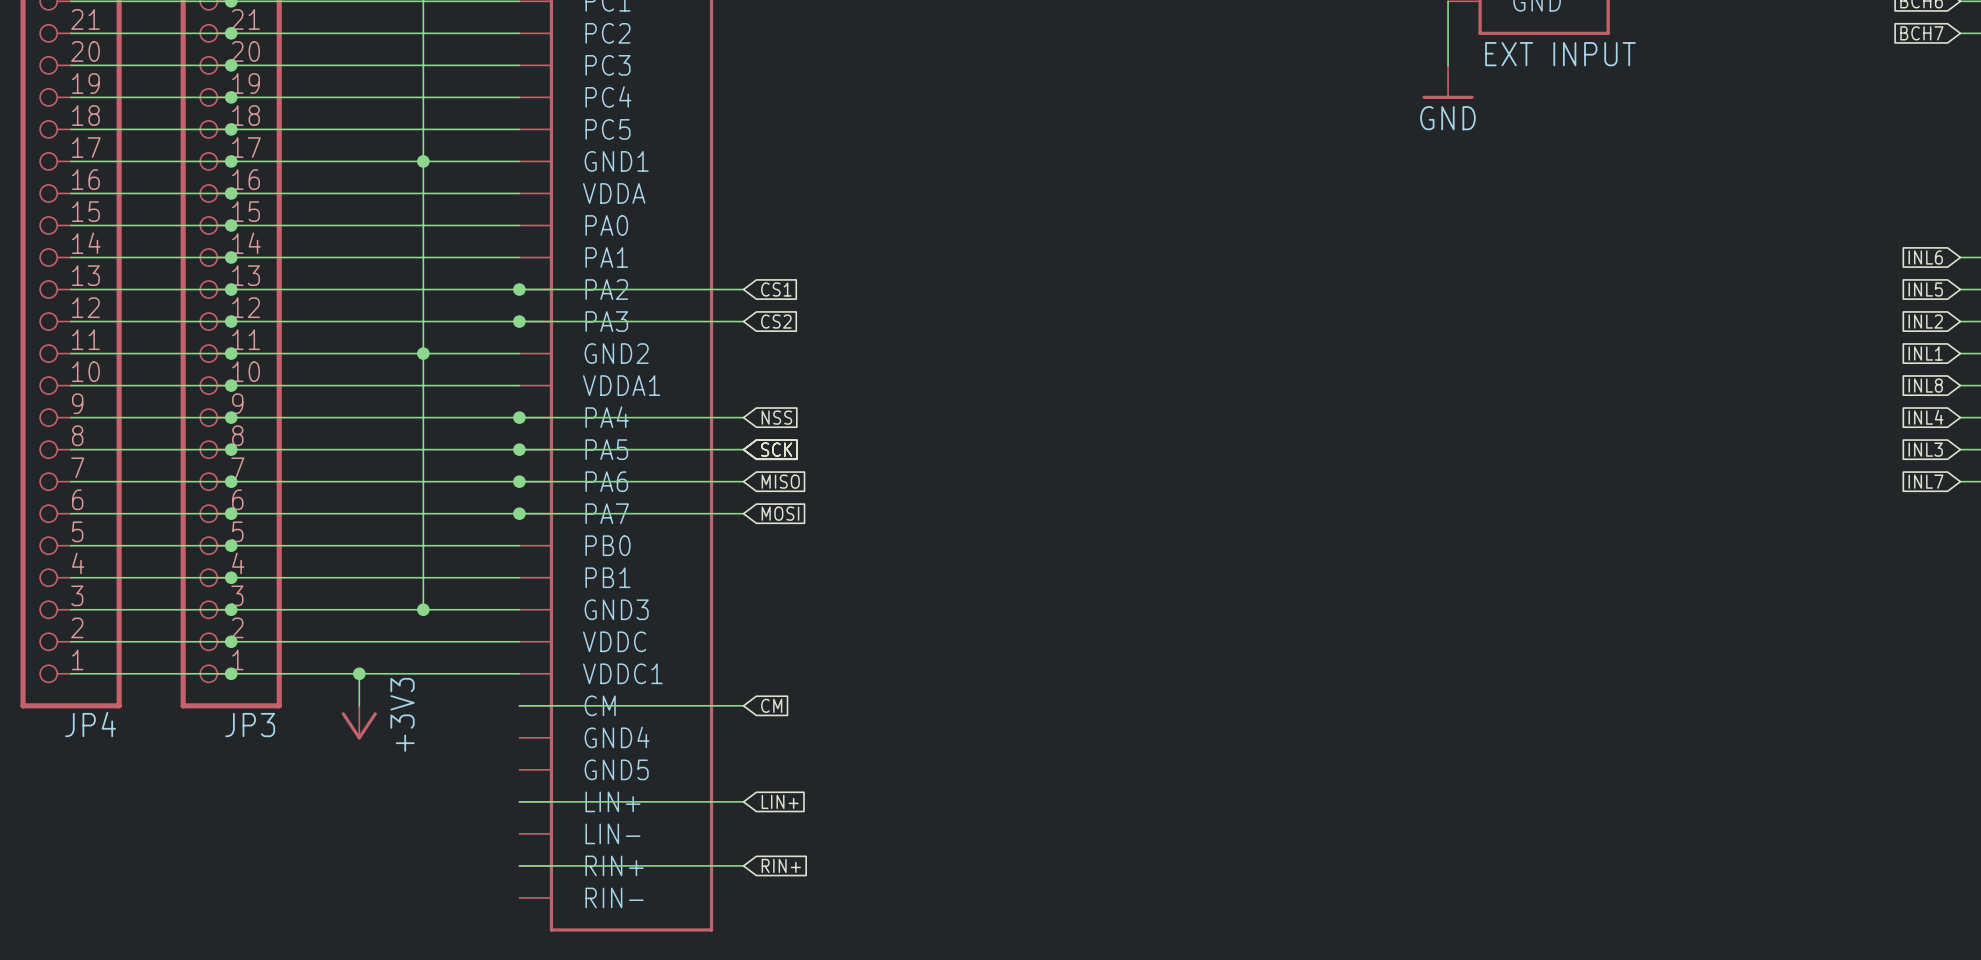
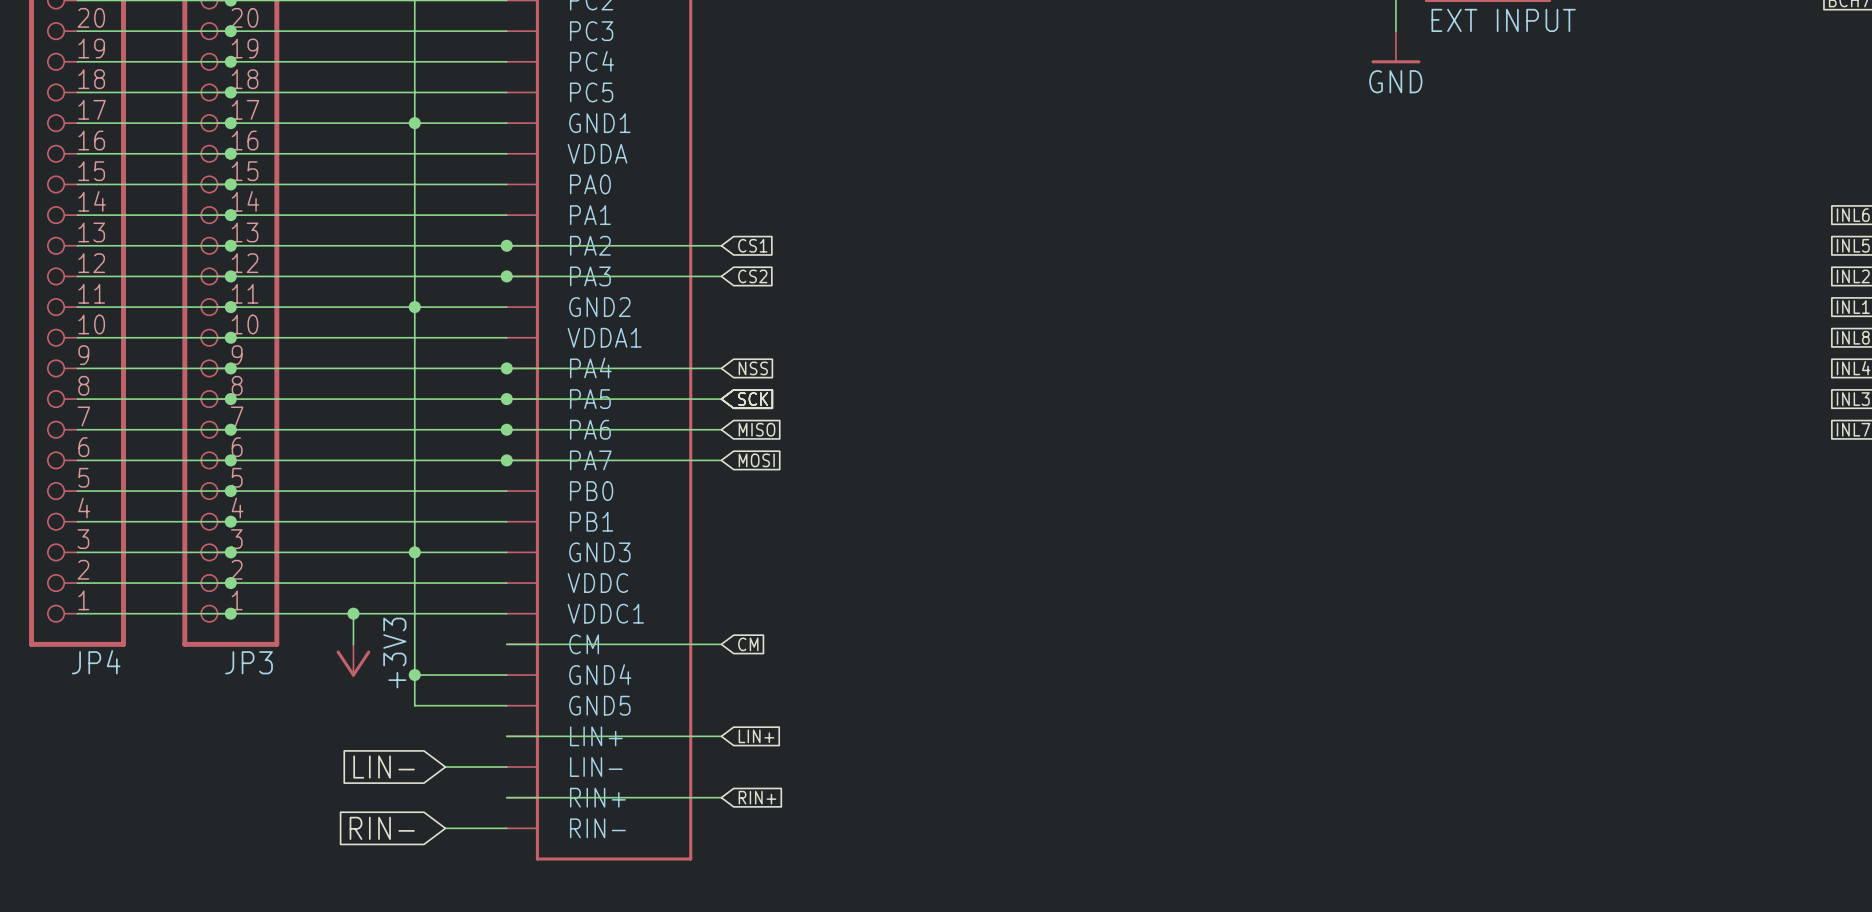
wire: none -> (414, 552) (414, 705) (506, 705)
wire: none -> (414, 675) (506, 675)
junction: none -> (414, 675)
global label: none -> LIN- (384, 767)
wire: none -> (445, 767) (506, 767)
global label: none -> RIN- (382, 828)
wire: none -> (445, 828) (506, 828)

